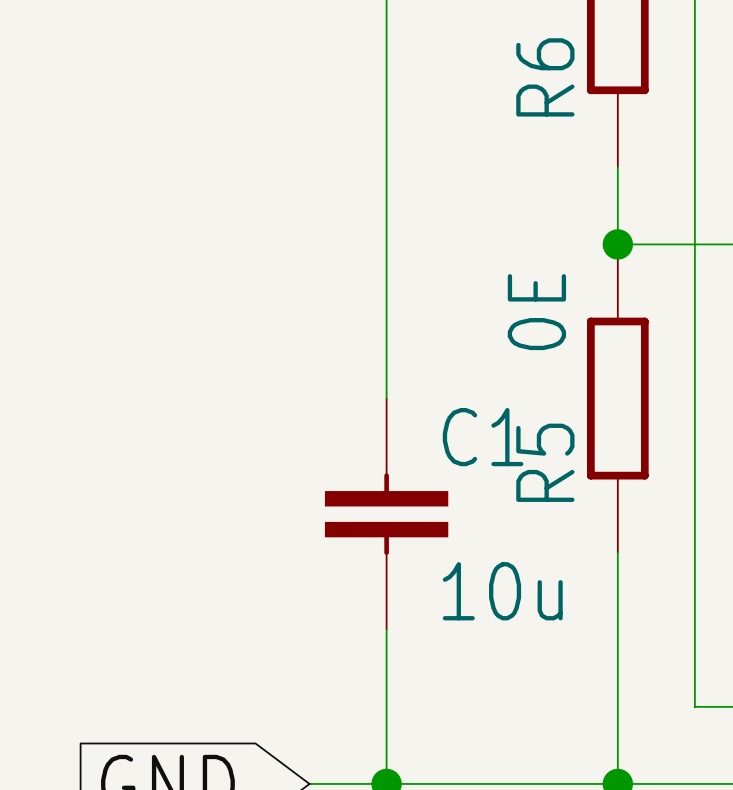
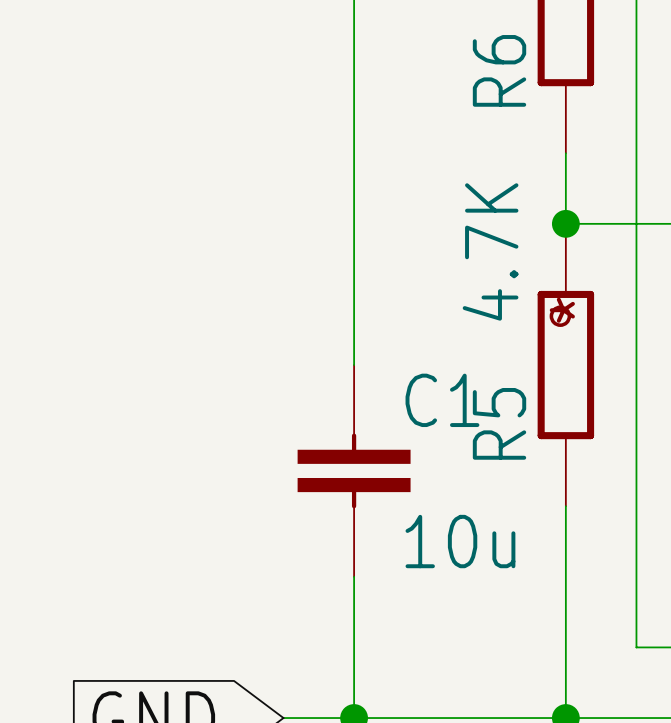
R5 symbol: [587, 244, 649, 553] -> [537, 223, 595, 507]
R5 value: 0E (536, 312) -> 4.7K (490, 251)

